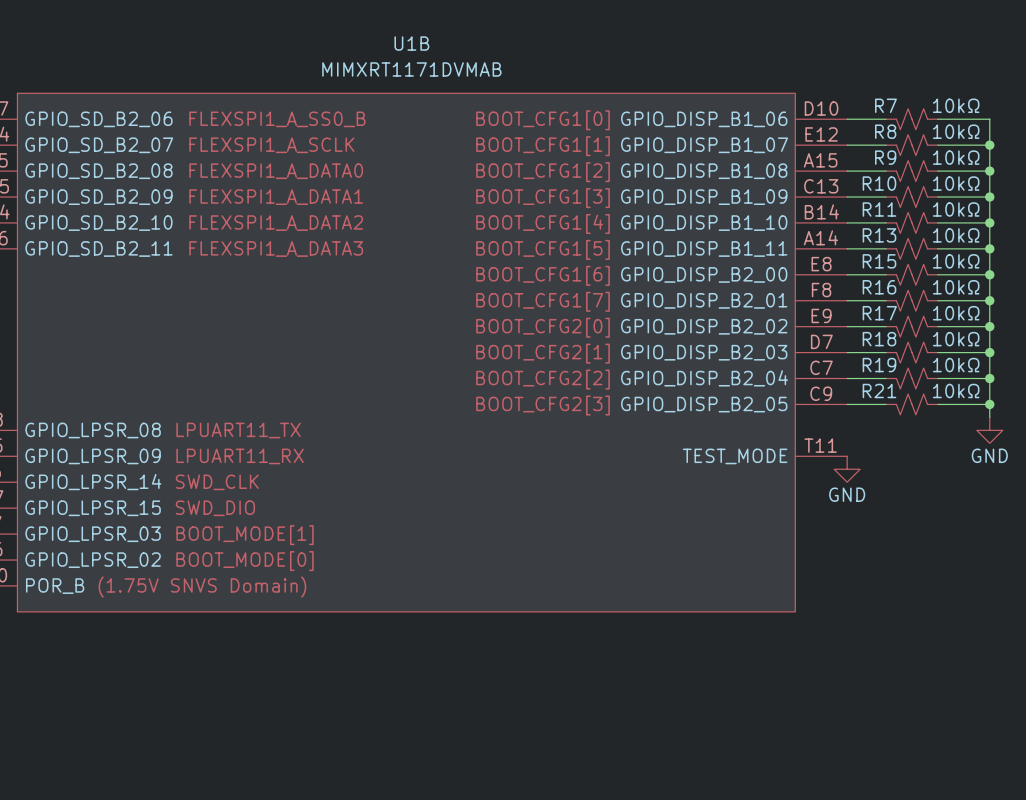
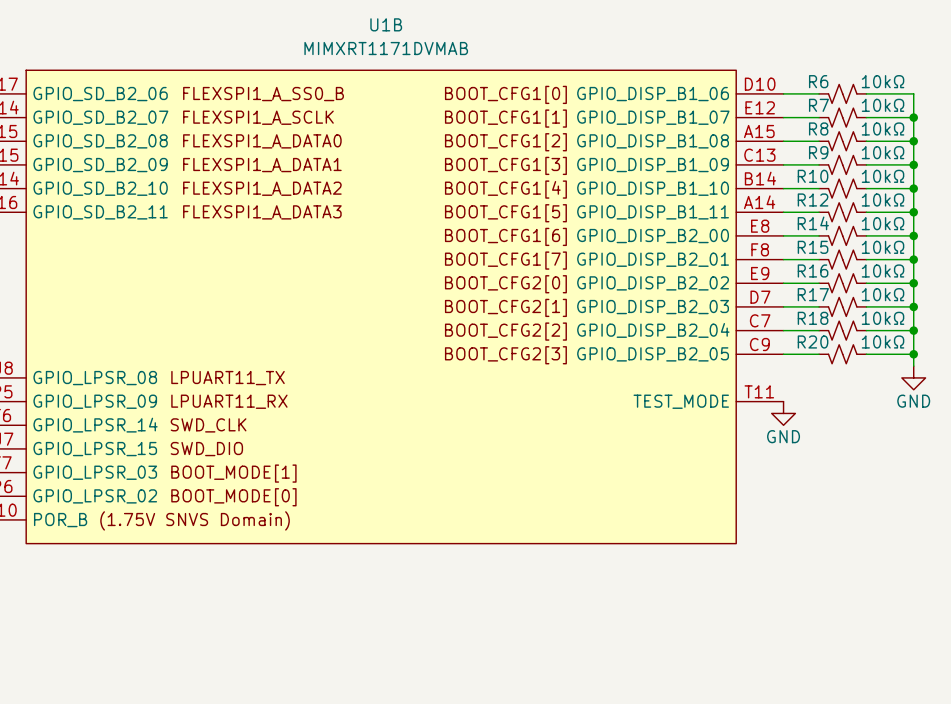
R7 name: R7 (885, 105) -> R6 (818, 81)
R8 name: R8 (885, 131) -> R7 (818, 105)
R9 name: R9 (885, 157) -> R8 (818, 128)
R10 name: R10 (879, 183) -> R9 (818, 152)
R11 name: R11 (879, 209) -> R10 (813, 176)
R13 name: R13 (879, 235) -> R12 (813, 199)
R15 name: R15 (879, 261) -> R14 (813, 223)
R16 name: R16 (879, 287) -> R15 (813, 247)
R17 name: R17 (879, 313) -> R16 (813, 271)
R18 name: R18 (879, 339) -> R17 (813, 294)
R19 name: R19 (879, 365) -> R18 (813, 318)
R21 name: R21 (879, 390) -> R20 (813, 342)

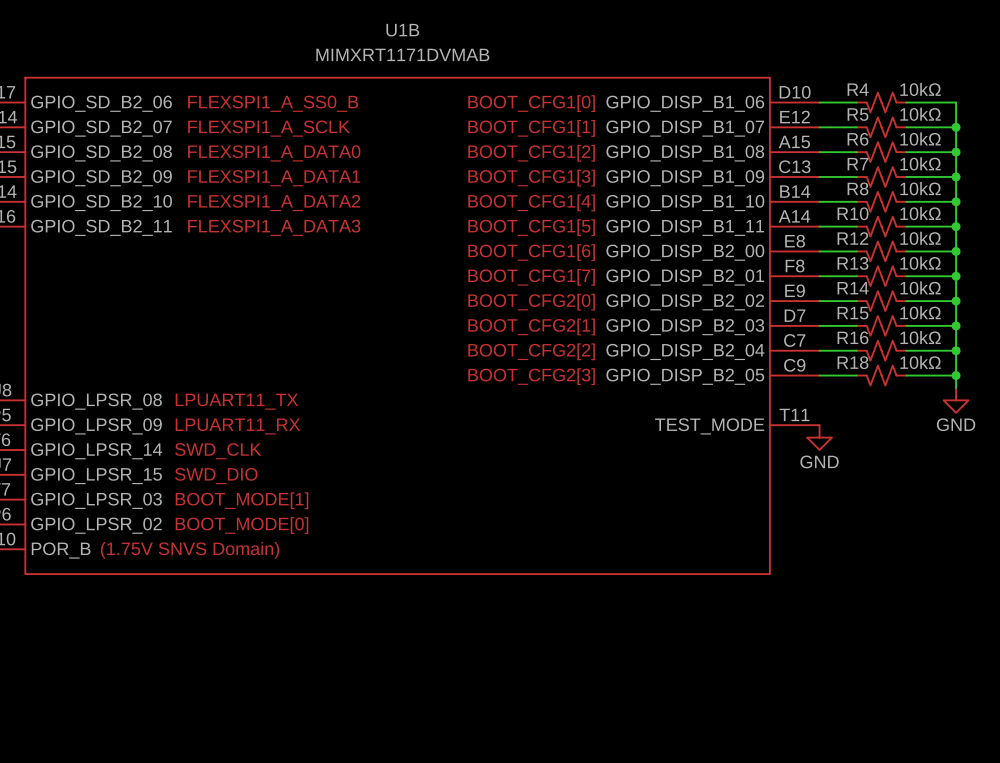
R6 name: R6 (818, 81) -> R4 (858, 89)
R7 name: R7 (818, 105) -> R5 (858, 114)
R8 name: R8 (818, 128) -> R6 (858, 139)
R9 name: R9 (818, 152) -> R7 (857, 164)
R10 name: R10 (813, 176) -> R8 (858, 188)
R12 name: R12 (813, 199) -> R10 (853, 213)
R14 name: R14 (813, 223) -> R12 (852, 238)
R15 name: R15 (813, 247) -> R13 (852, 263)
R16 name: R16 (813, 271) -> R14 (853, 288)
R17 name: R17 (813, 294) -> R15 (853, 313)
R18 name: R18 (813, 318) -> R16 (852, 337)
R20 name: R20 (813, 342) -> R18 (852, 362)

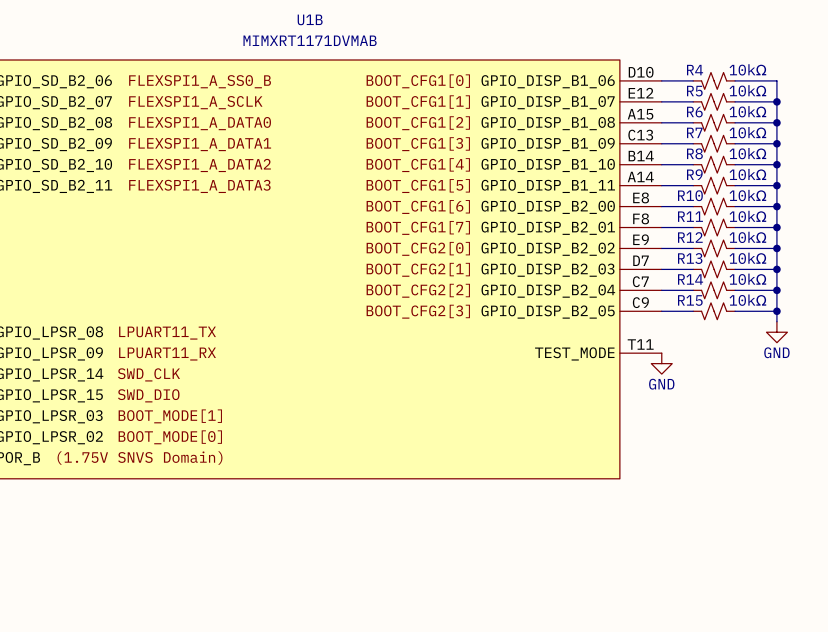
R10 name: R10 (853, 213) -> R9 (694, 174)
R12 name: R12 (852, 238) -> R10 (690, 195)
R13 name: R13 (852, 263) -> R11 (690, 216)
R14 name: R14 (853, 288) -> R12 (690, 237)
R15 name: R15 (853, 313) -> R13 (690, 258)
R16 name: R16 (852, 337) -> R14 (690, 279)
R18 name: R18 (852, 362) -> R15 (690, 300)

